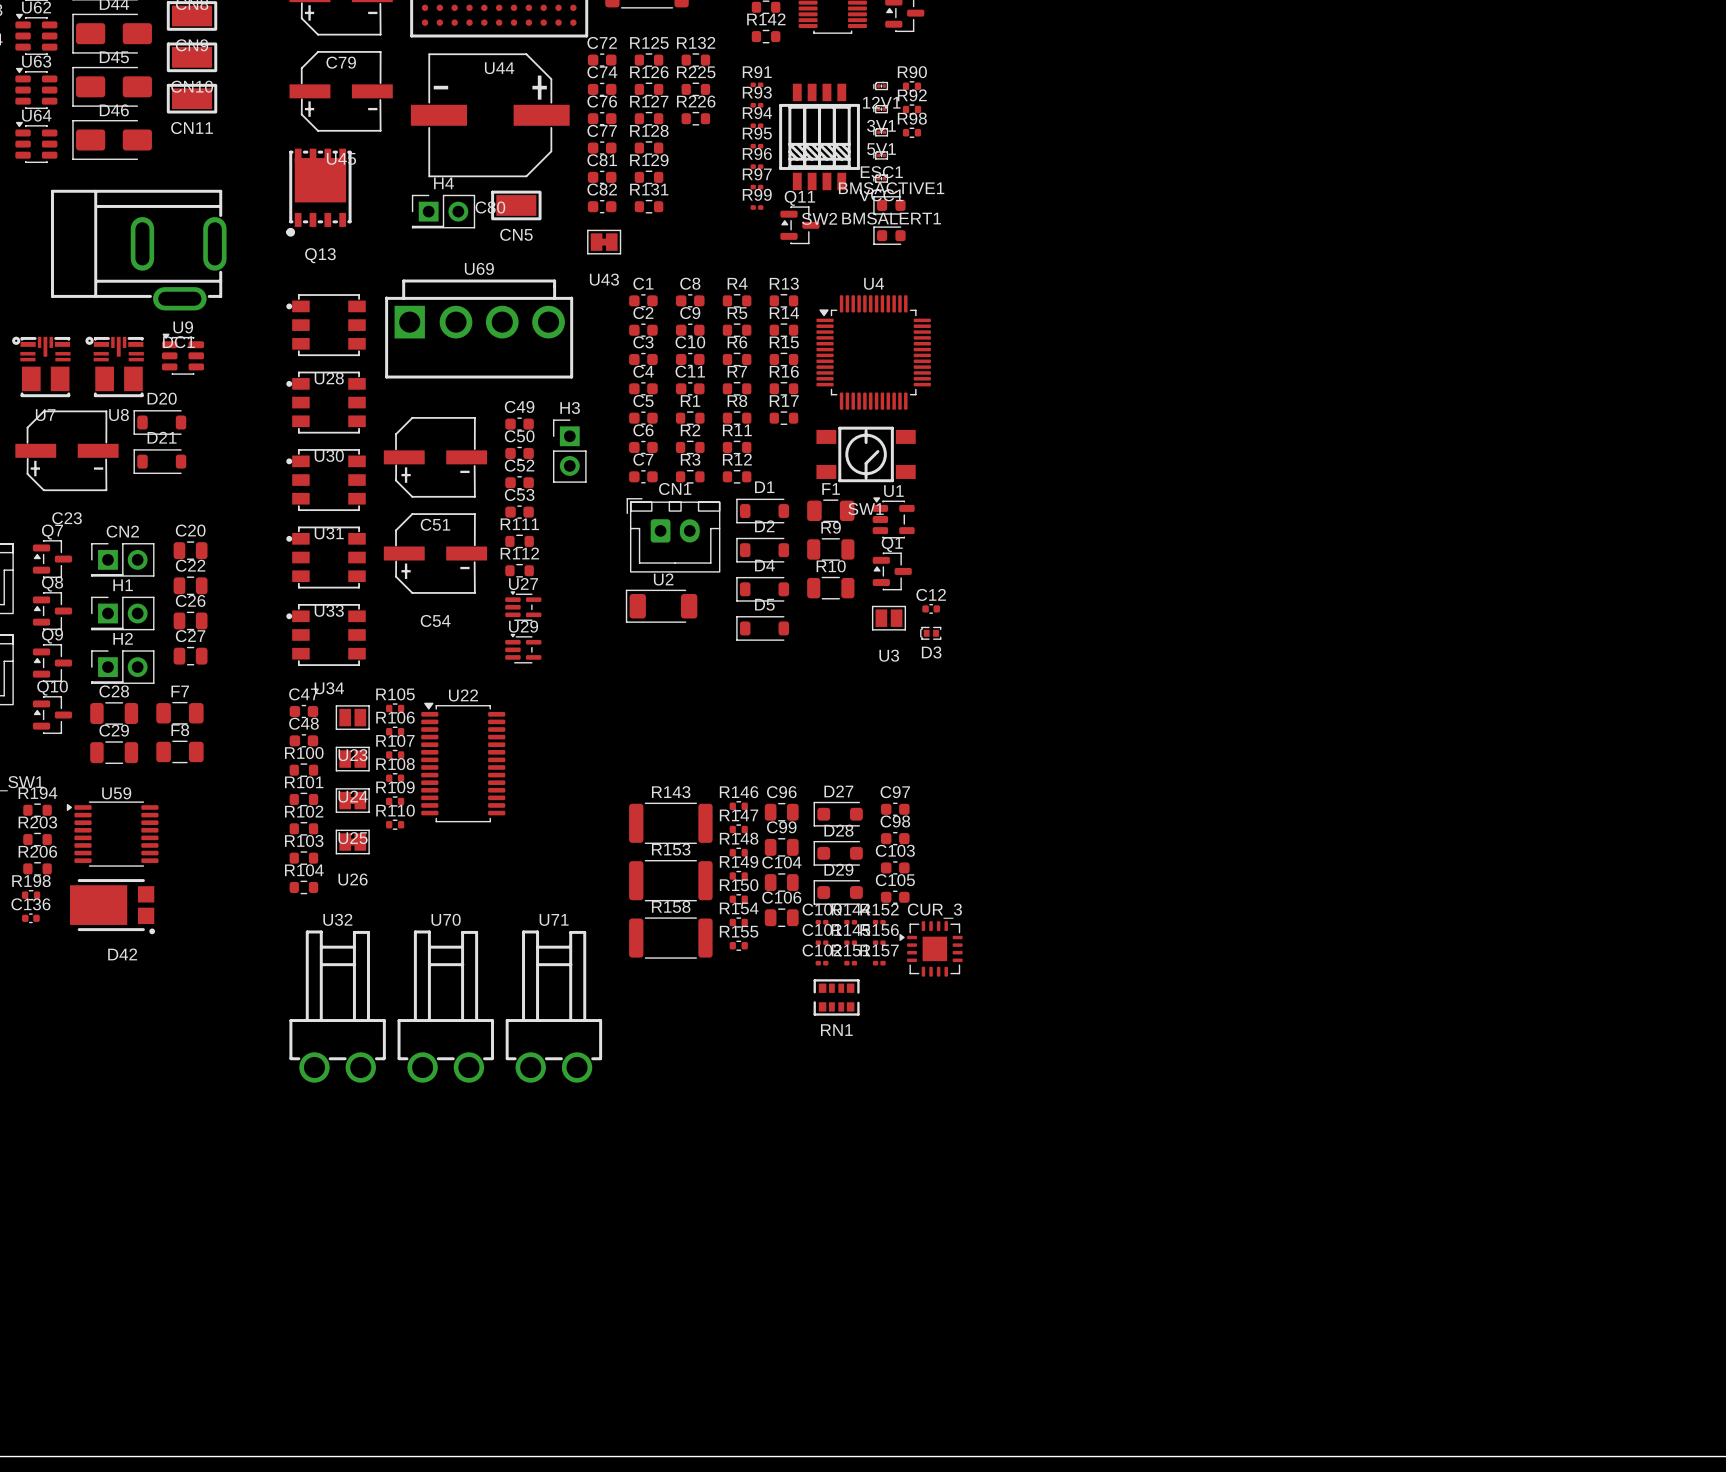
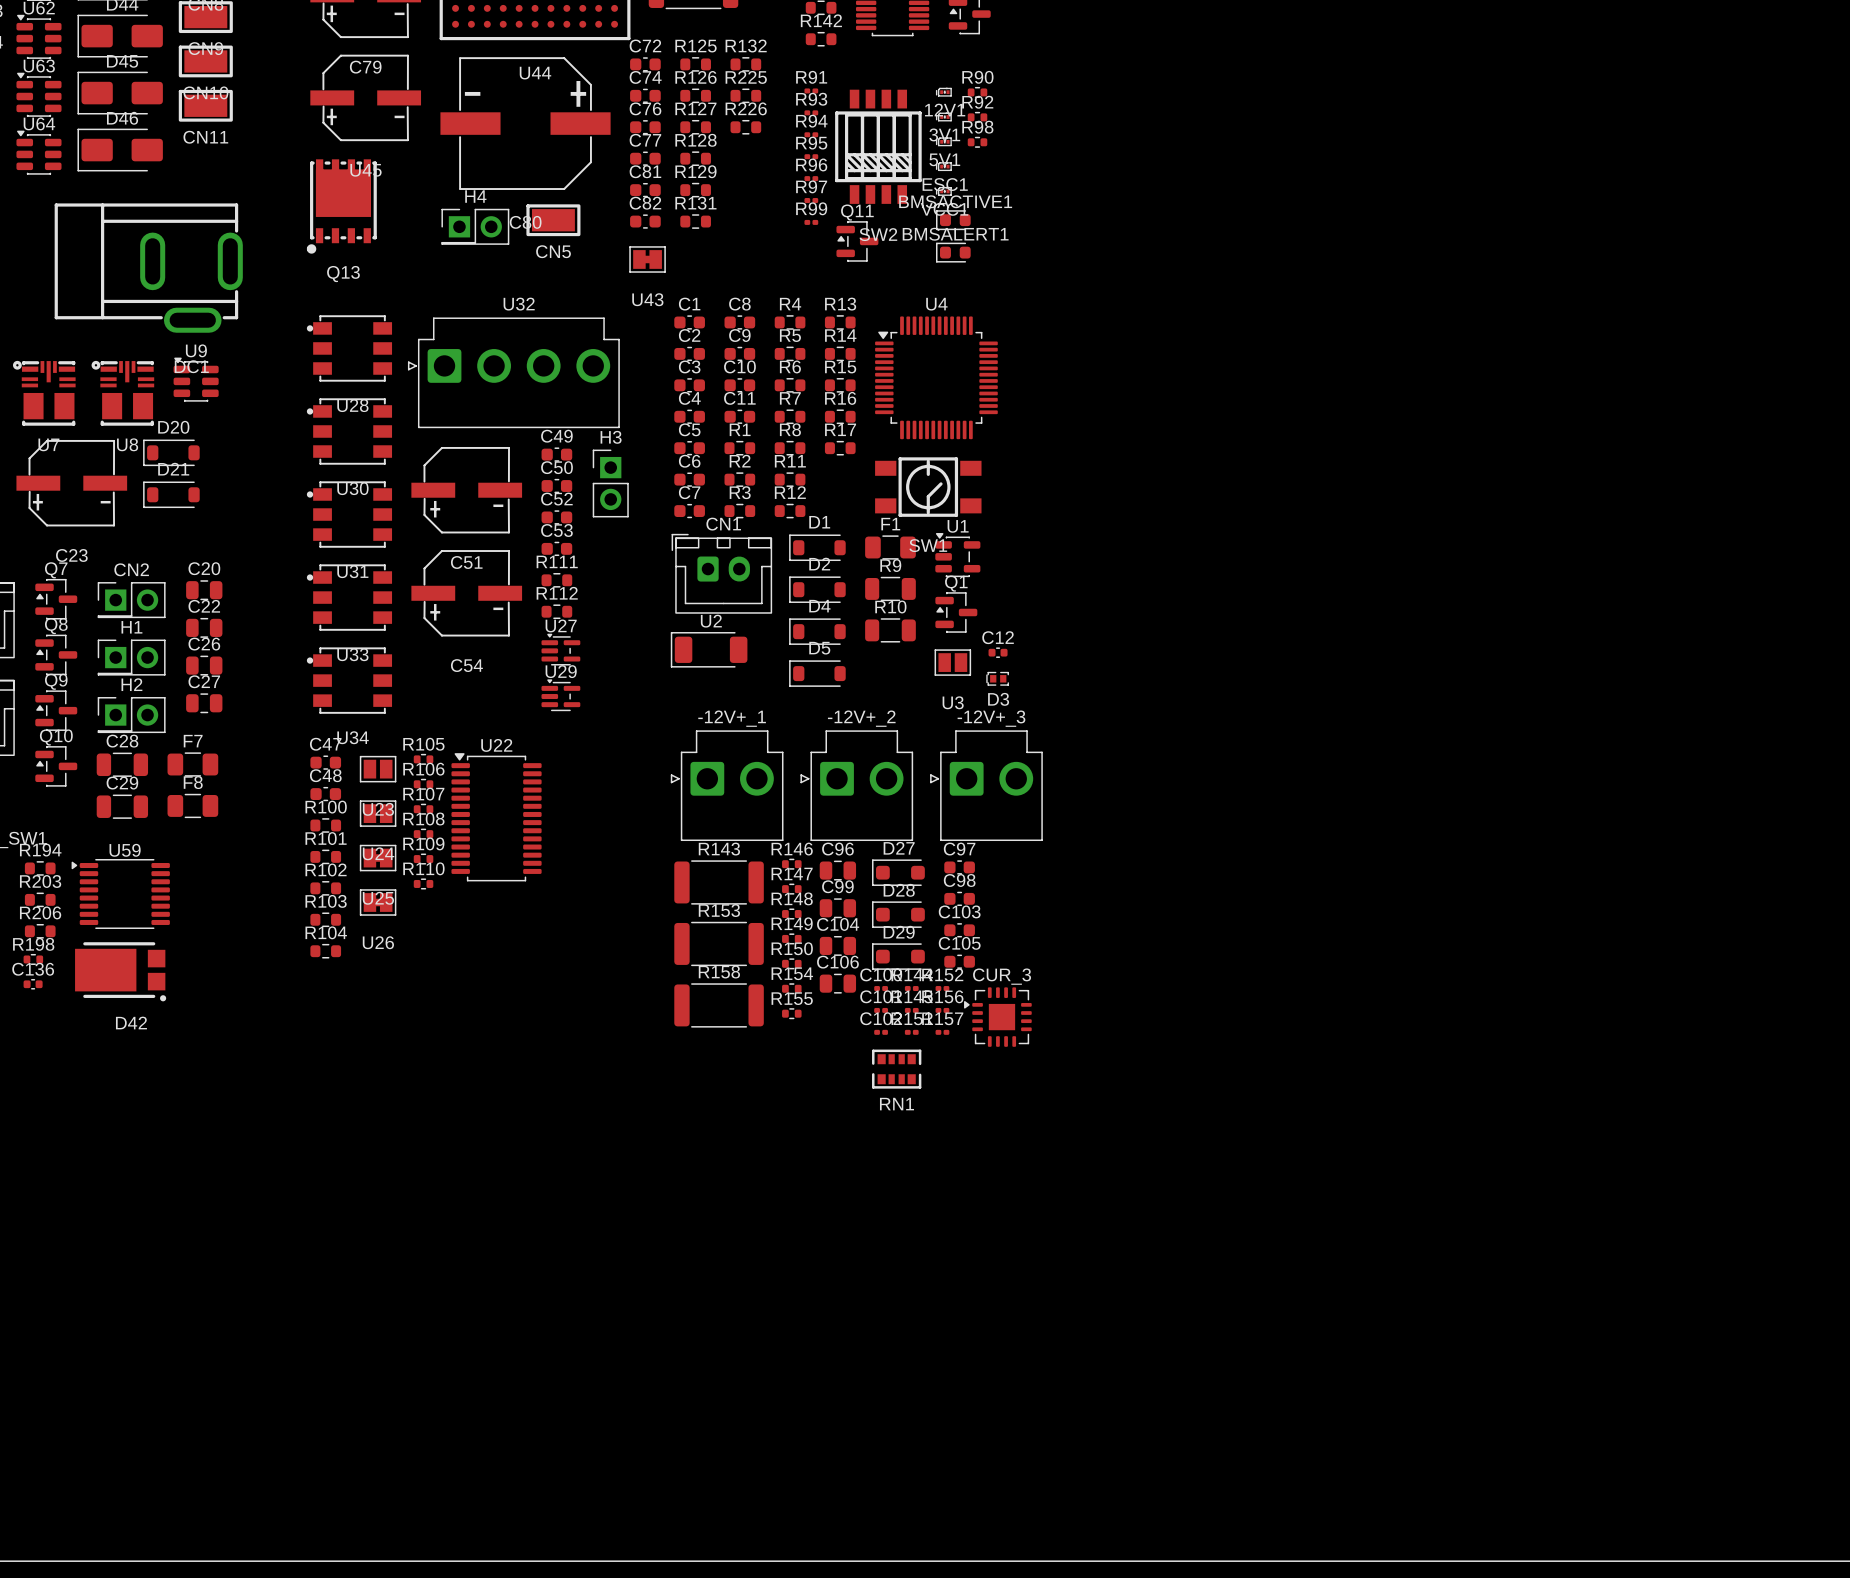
U69: (479, 329) -> none
-12V+_1: none -> (727, 785)
-12V+_2: none -> (856, 785)
-12V+_3: none -> (986, 785)
U32 footprint: [289, 930, 386, 1083] -> [407, 317, 620, 429]
U70: (445, 1006) -> none
U71: (553, 1006) -> none

